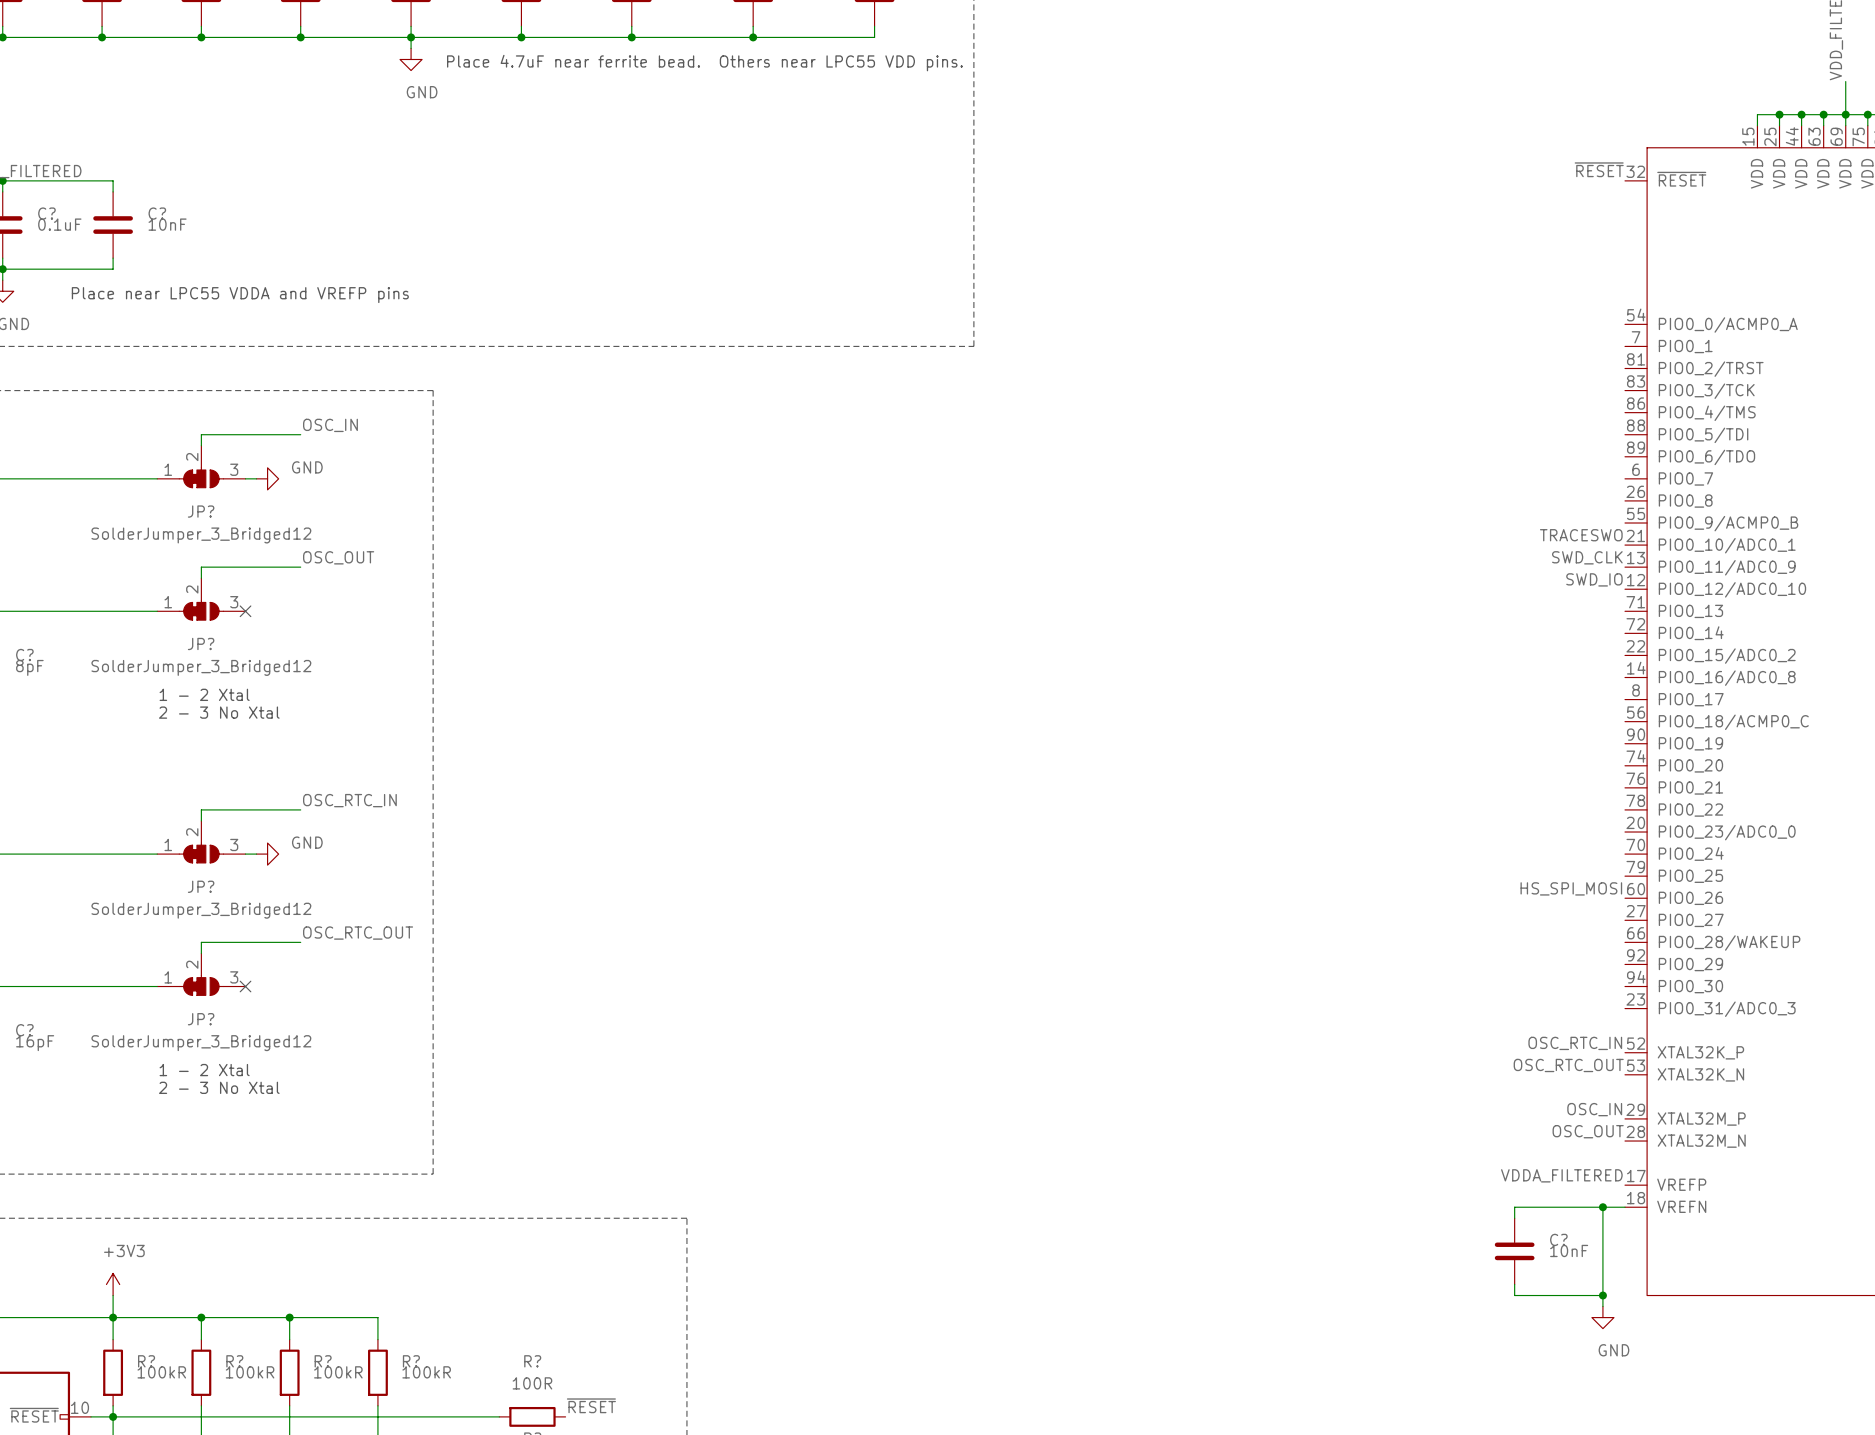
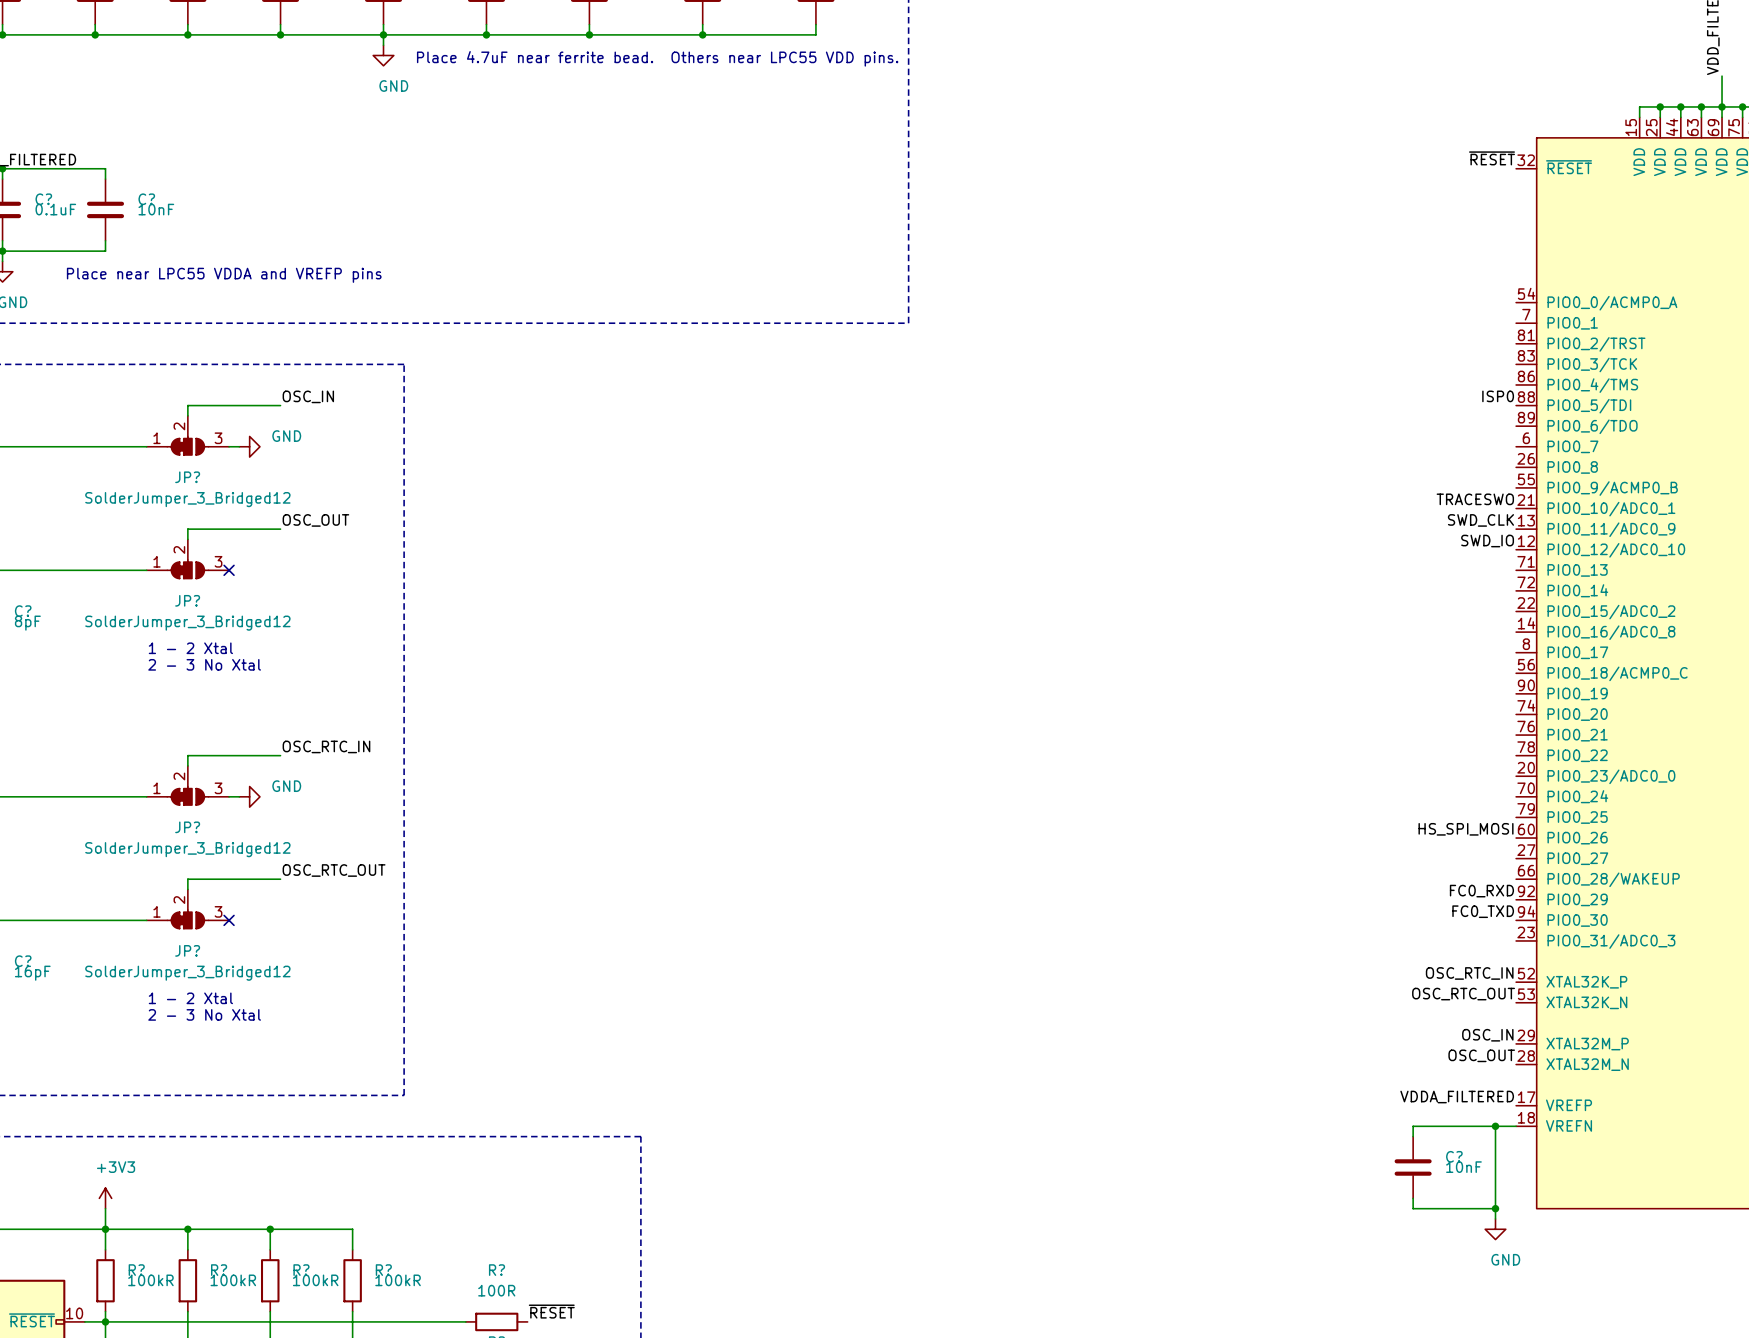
label: none -> ISP0 (1498, 396)
label: none -> FC0_RXD (1481, 891)
label: none -> FC0_TXD (1483, 911)

